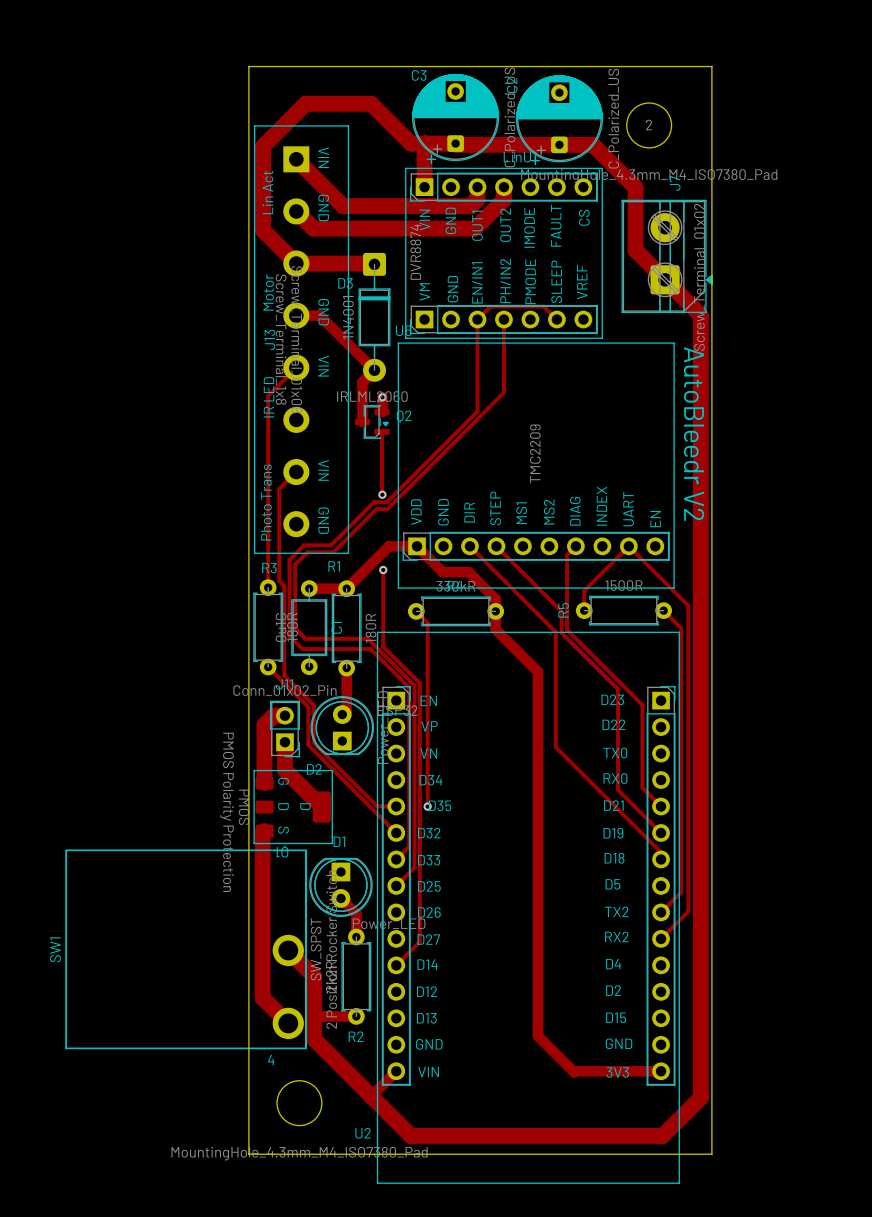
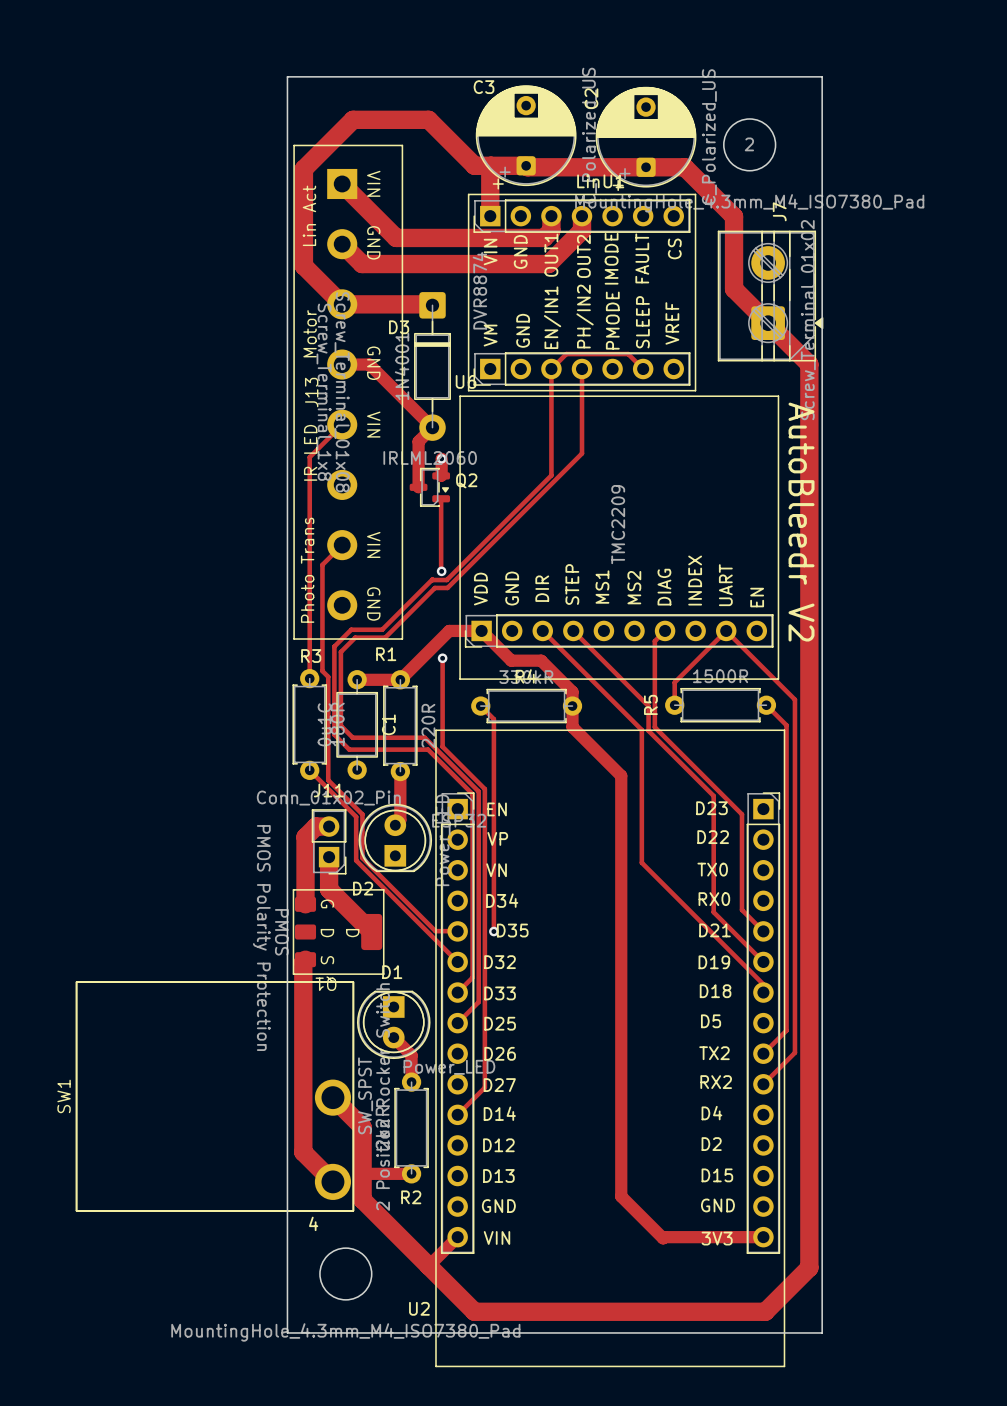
R1 value: 180R (370, 628) -> 220R (428, 725)

